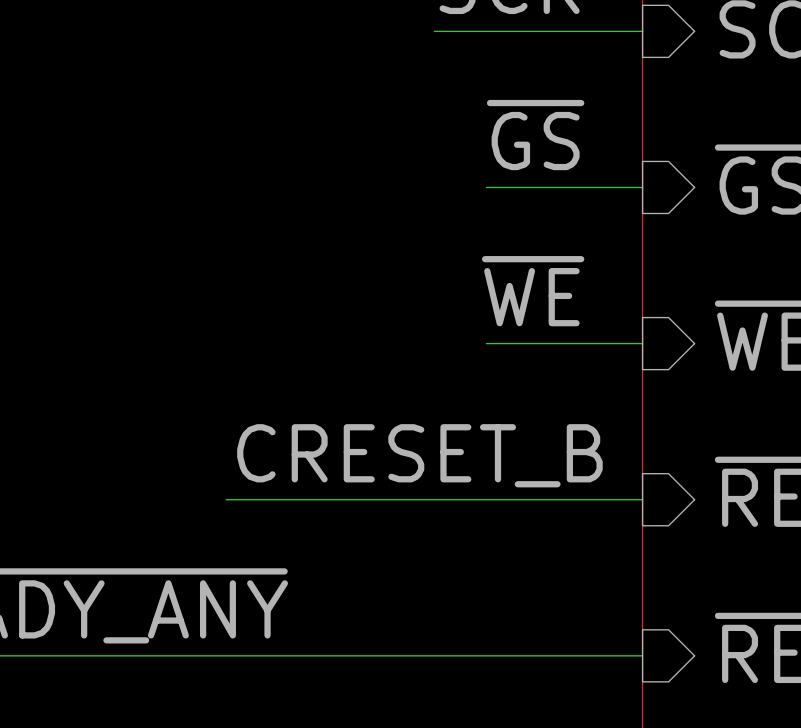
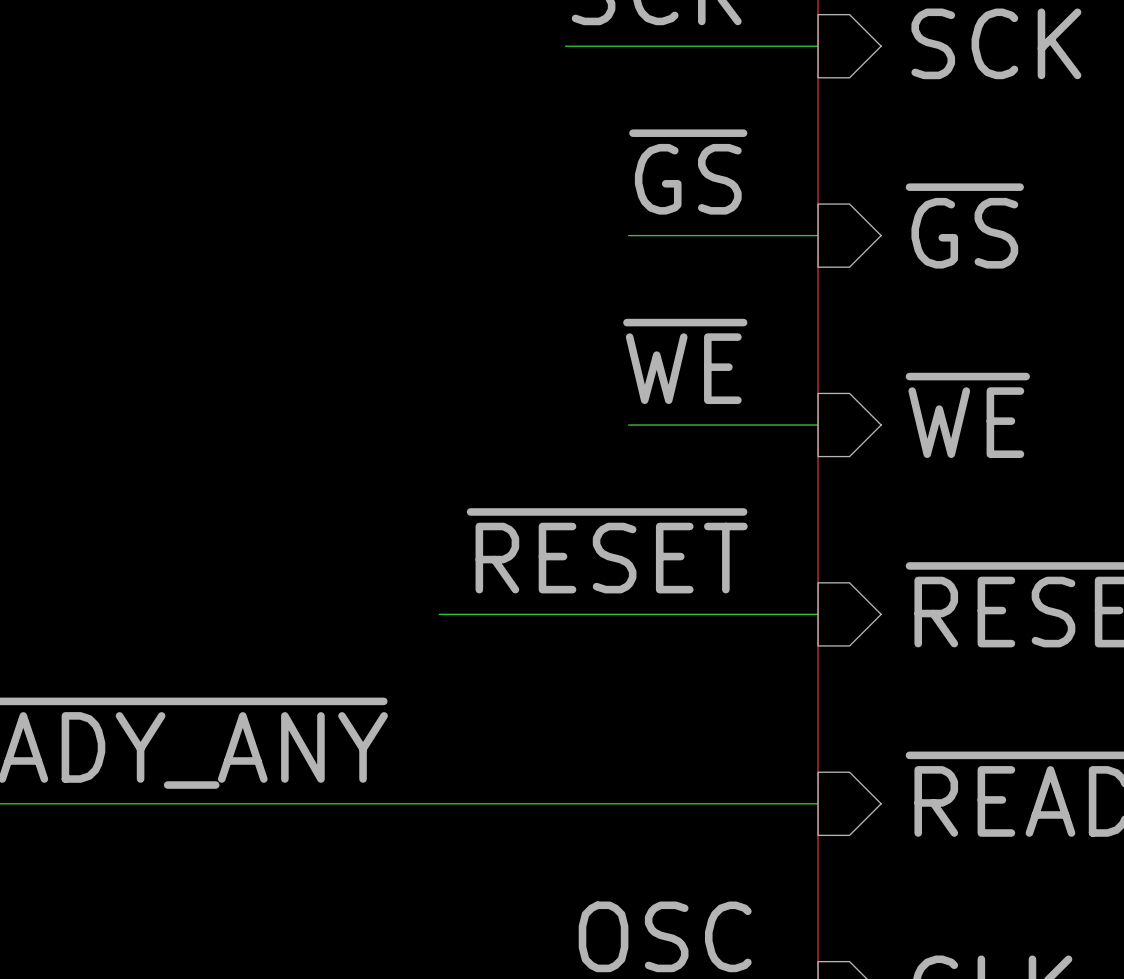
label: CRESET_B (419, 455) -> ~{RESET} (607, 550)
wire: (226, 499) (330, 499) -> none

